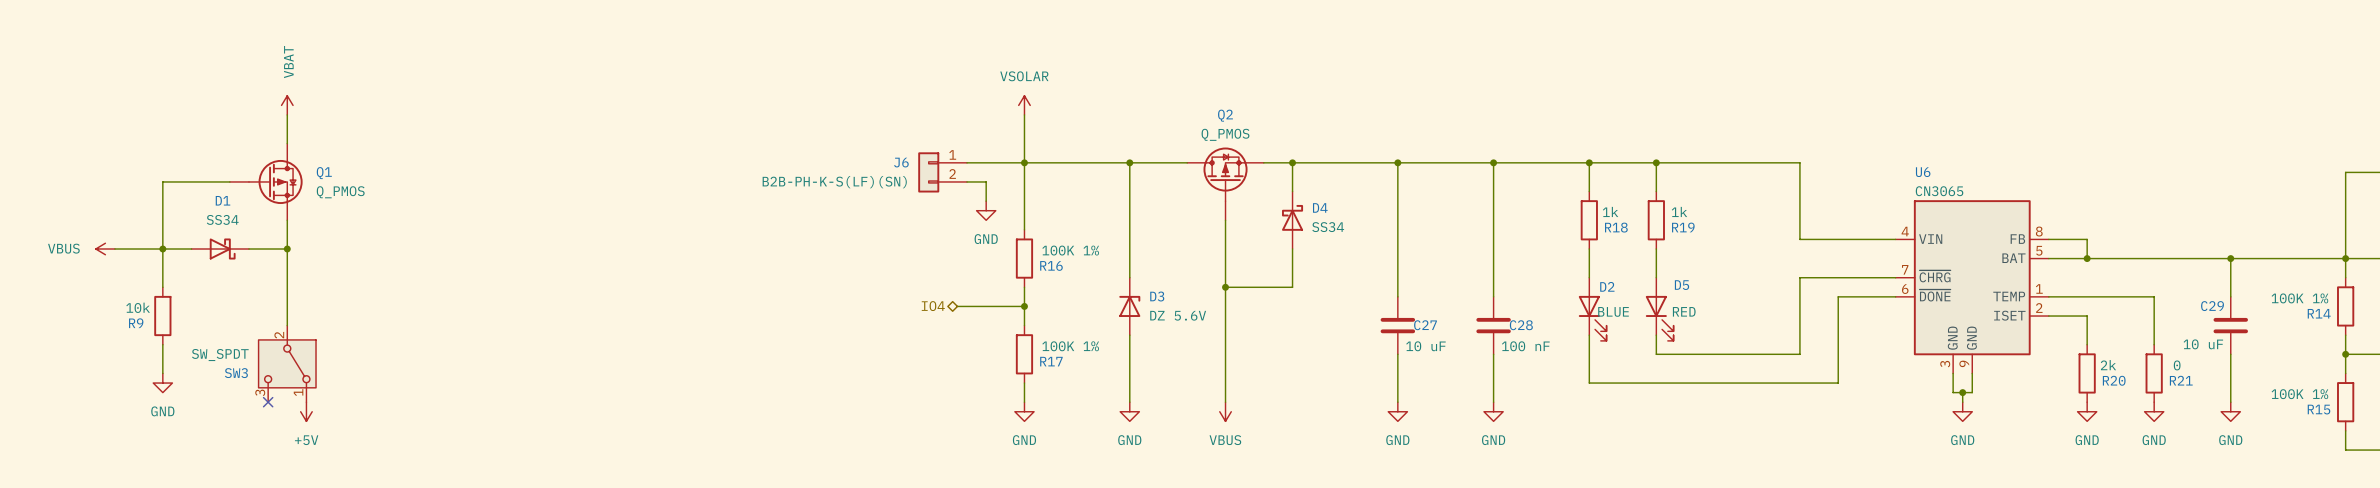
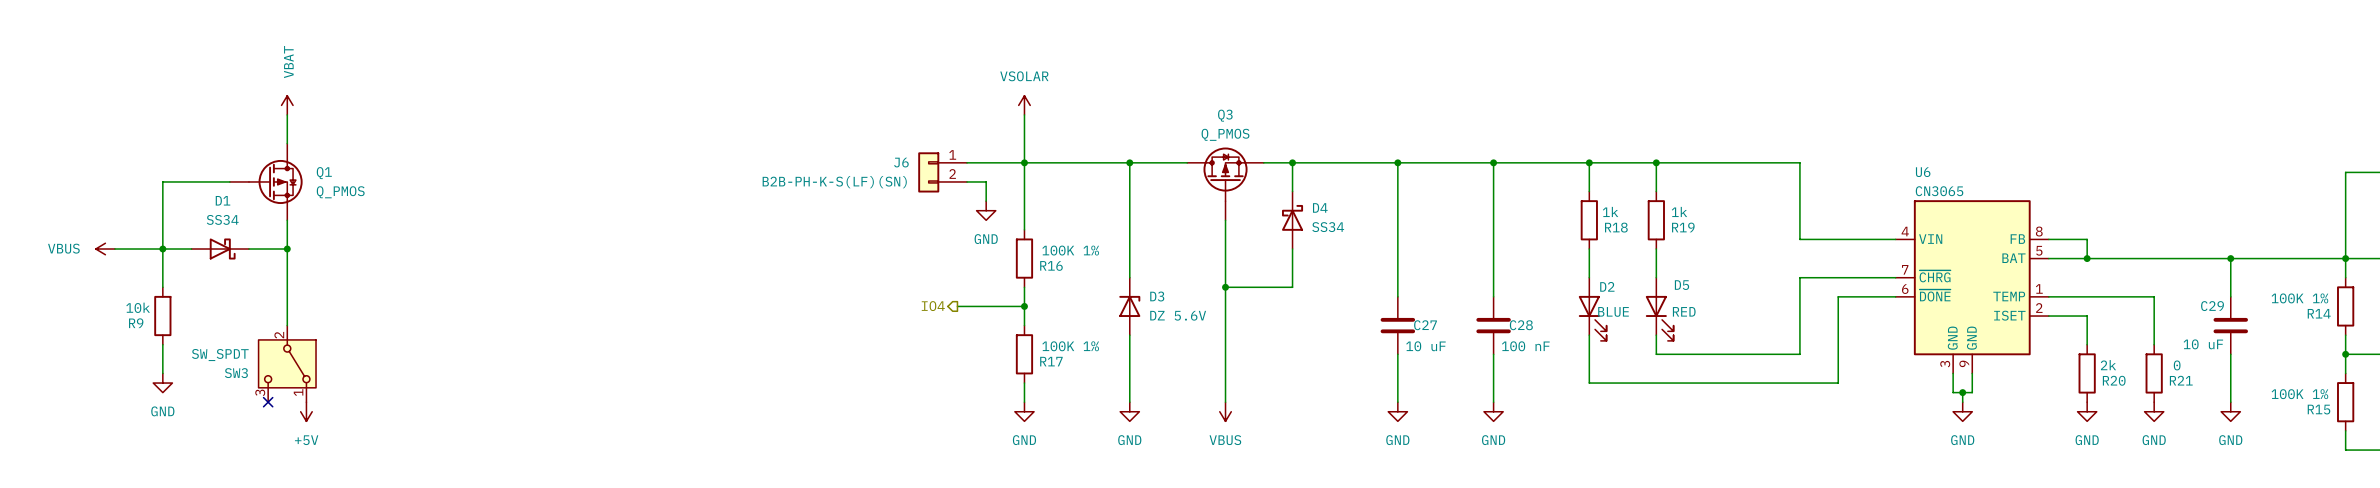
Q2 name: Q2 (1225, 115) -> Q3 (1225, 115)
hierarchical label shape: bidirectional (933, 306) -> output (933, 306)

